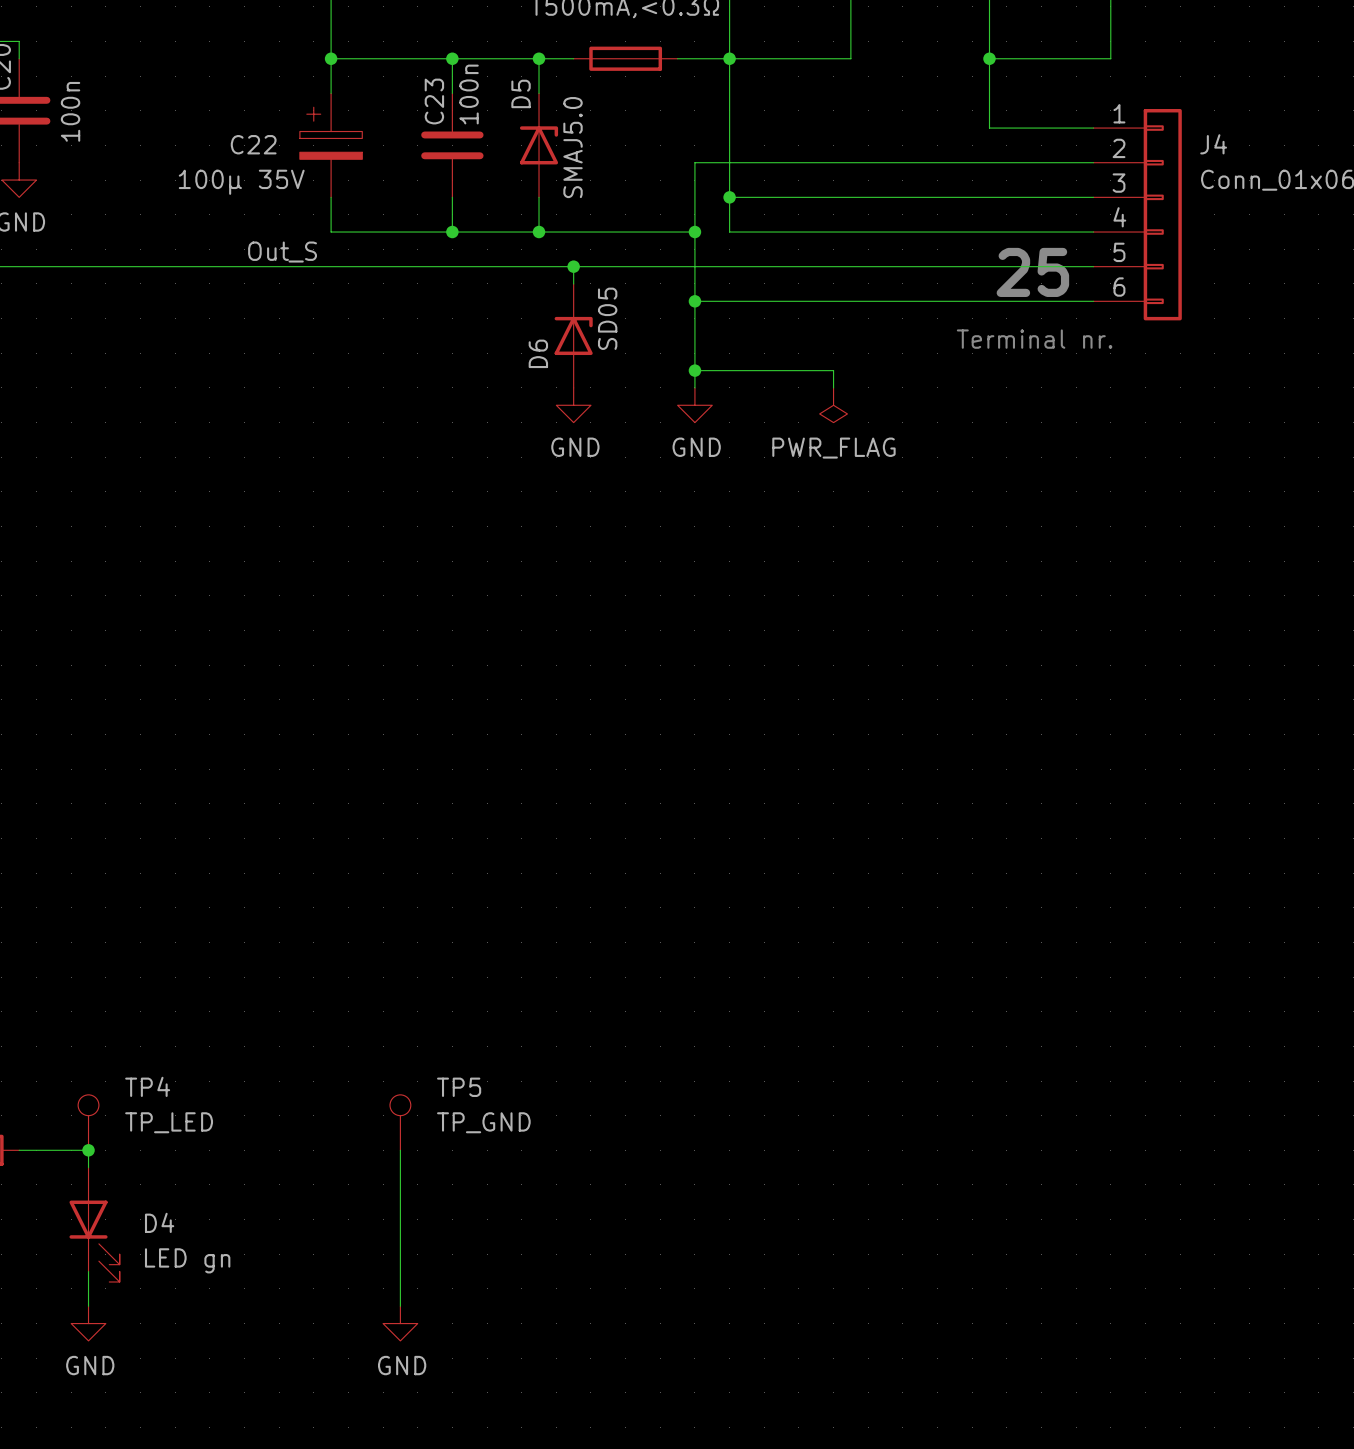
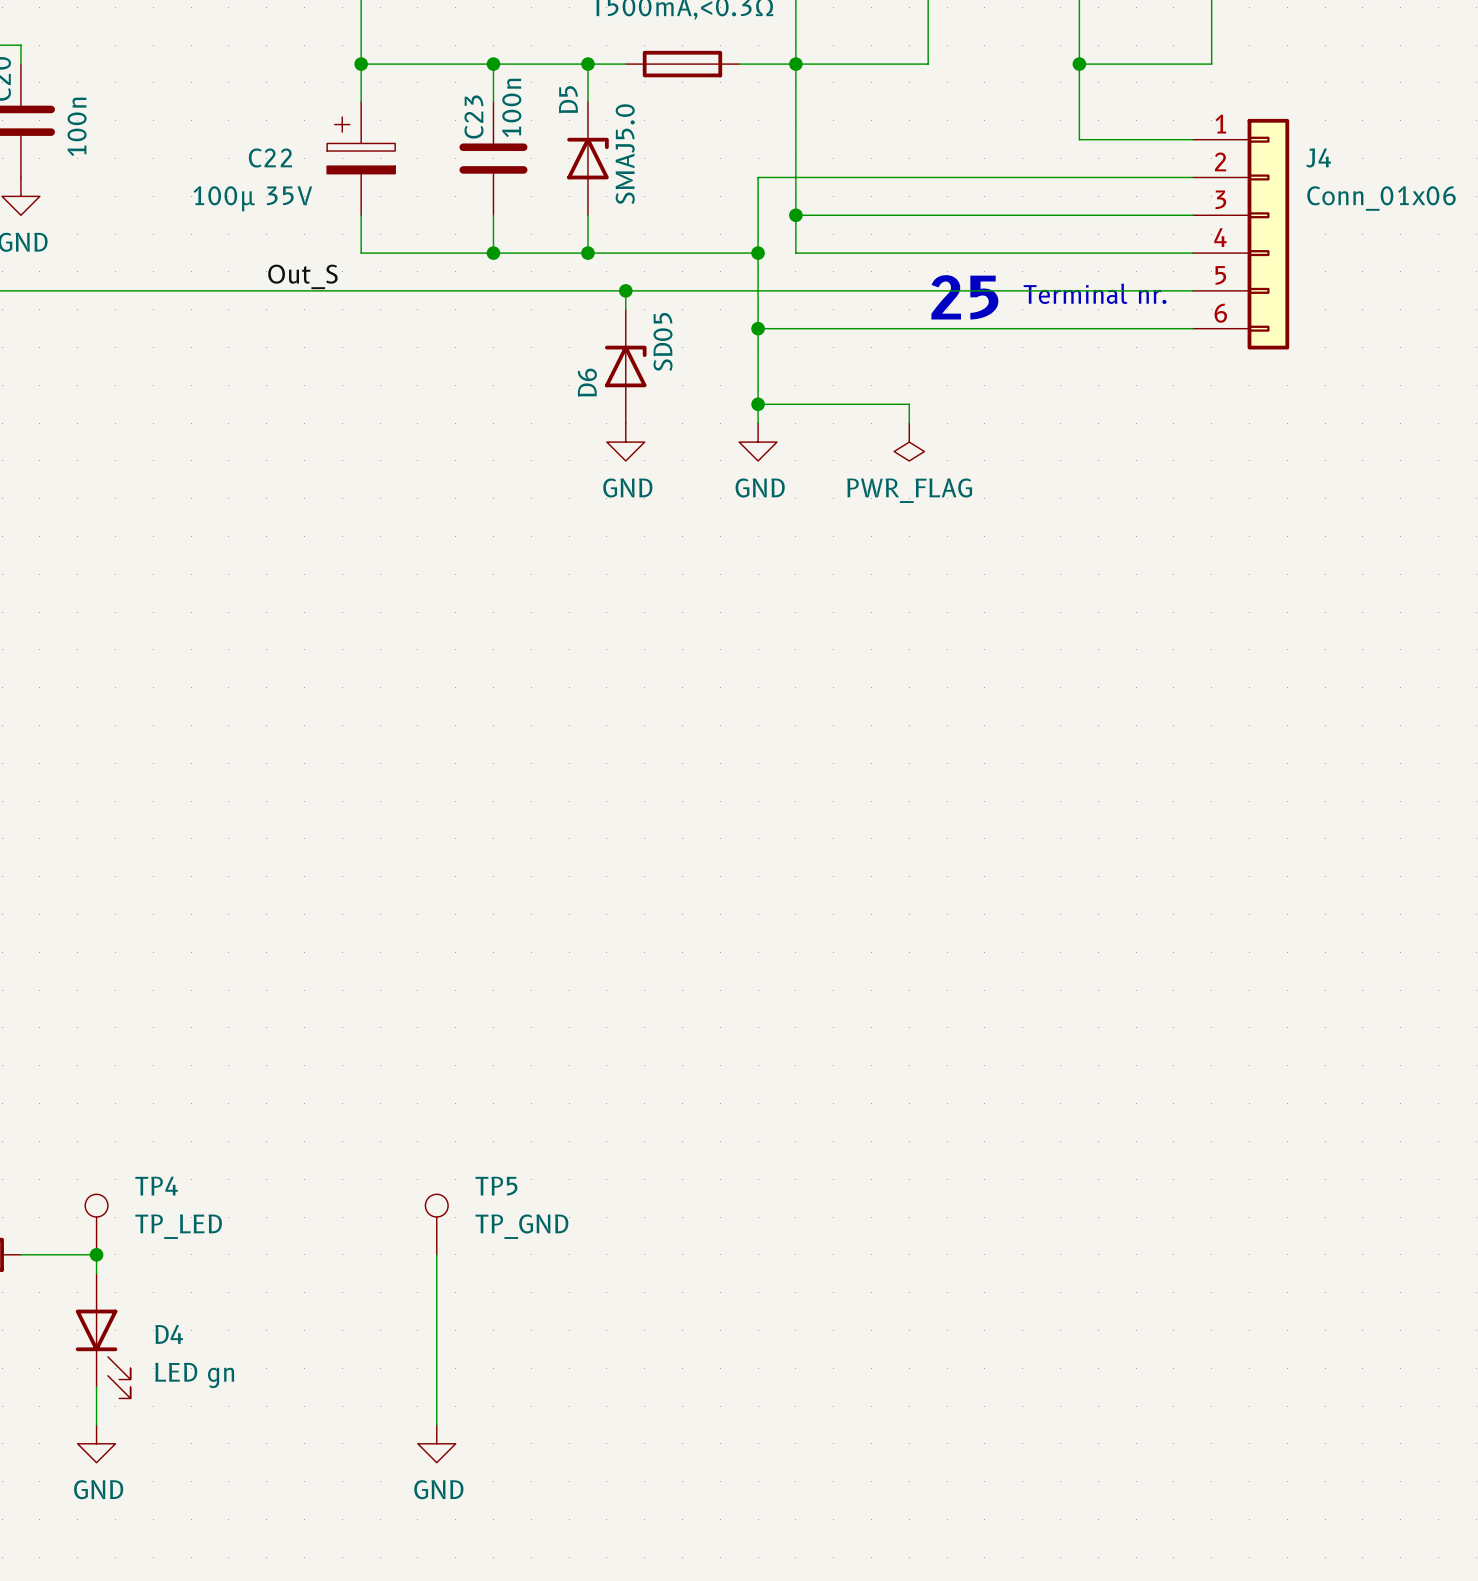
text position: 25 (1032, 272) -> 25 (964, 297)
text position: Terminal nr. (1034, 339) -> Terminal nr. (1095, 293)

